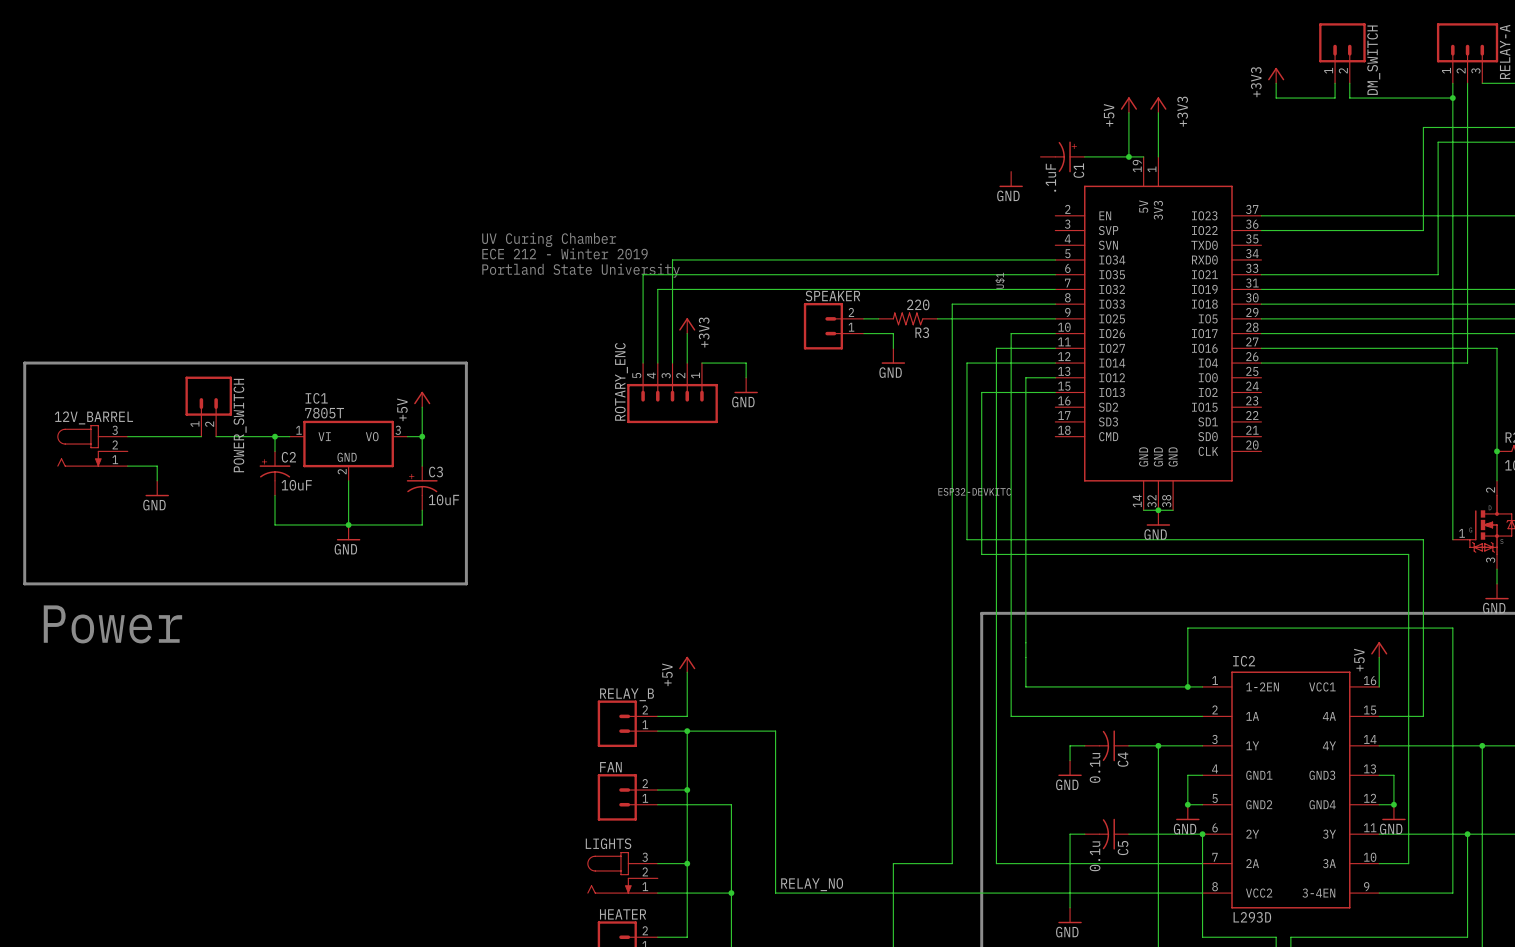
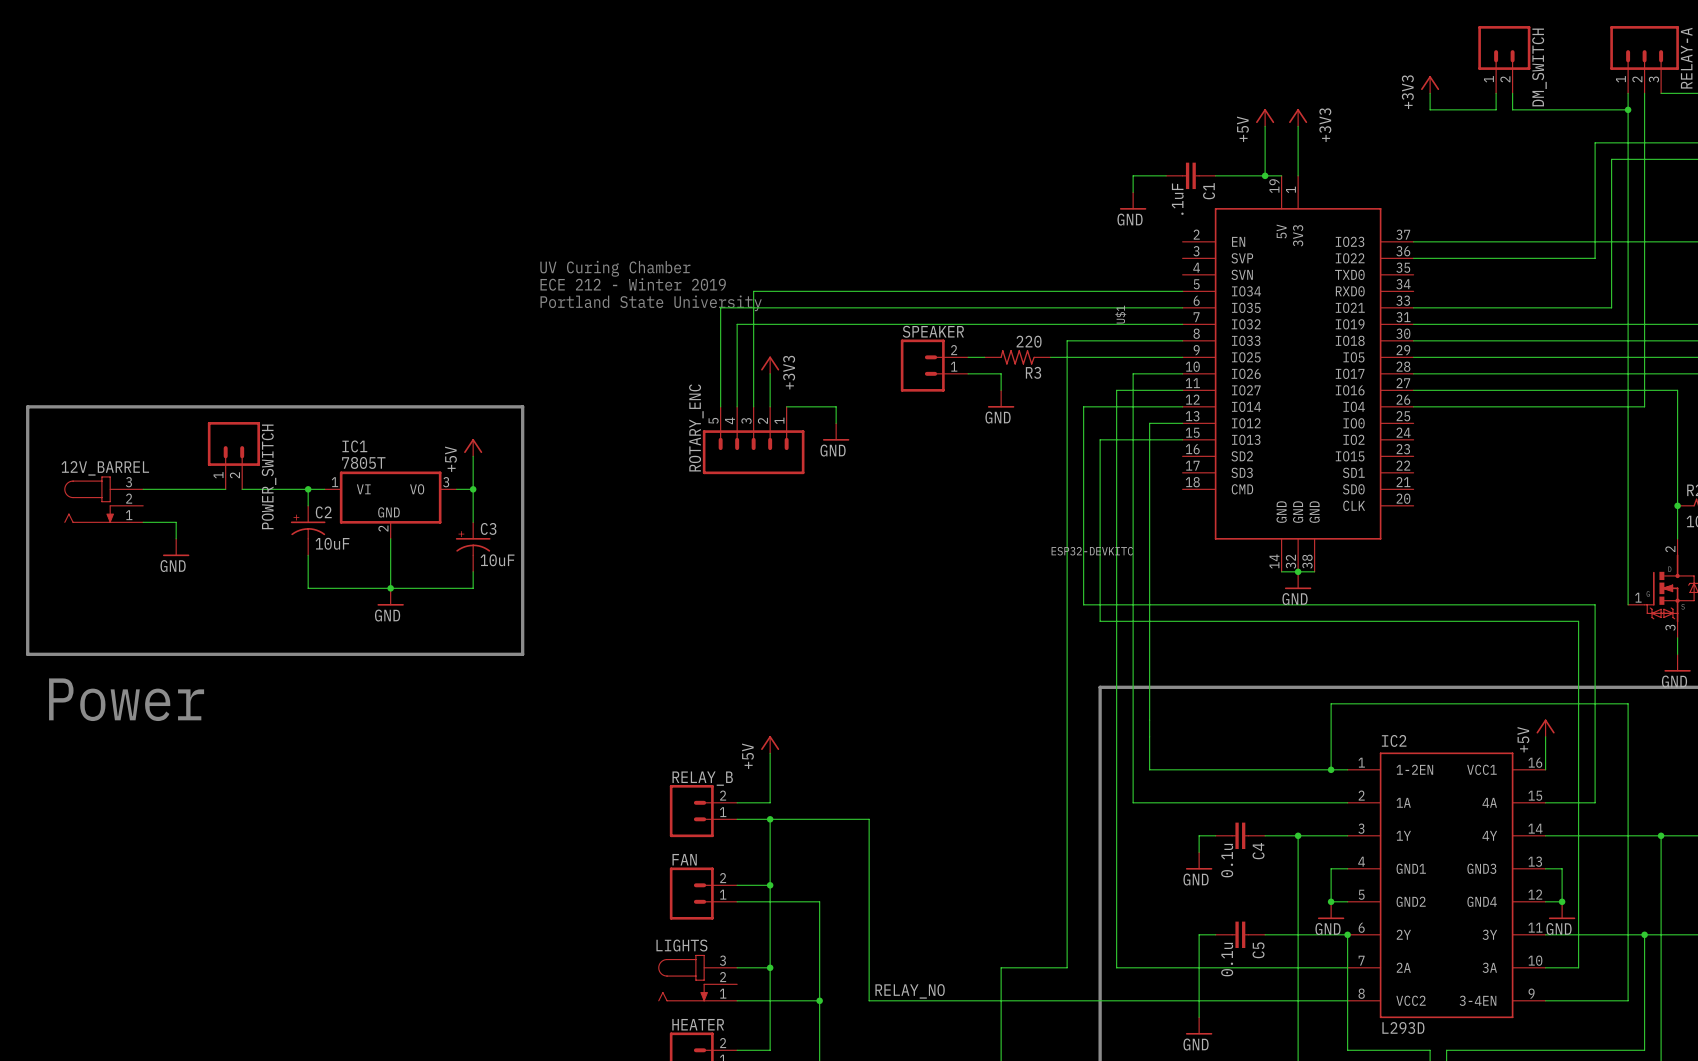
C1 symbol: [1040, 141, 1085, 173] -> [1166, 162, 1216, 190]
wire: none -> (1166, 175) (1133, 175) (1133, 192)
C4 symbol: [1084, 730, 1129, 762] -> [1215, 822, 1266, 850]
C5 symbol: [1084, 818, 1129, 850] -> [1215, 921, 1266, 949]

